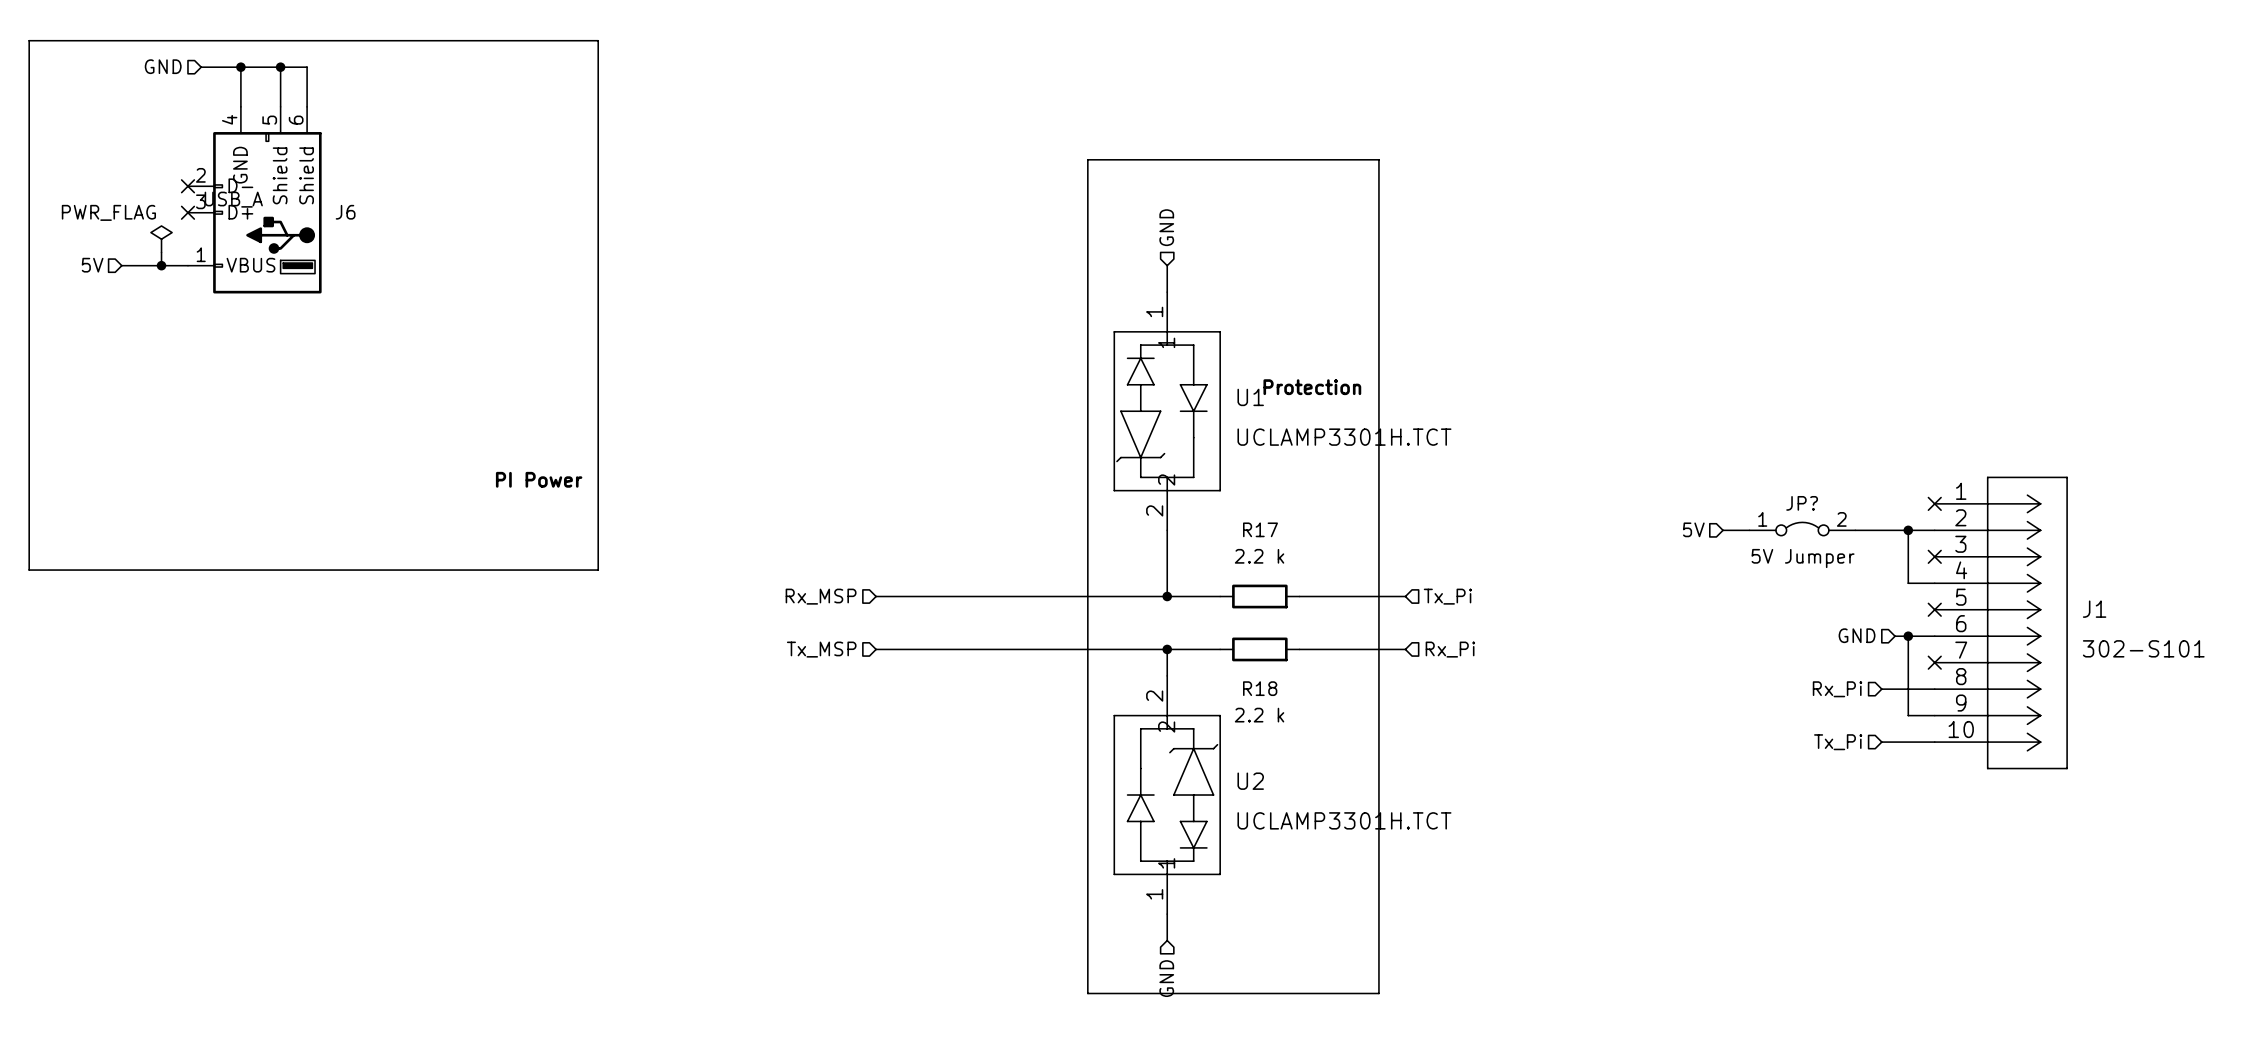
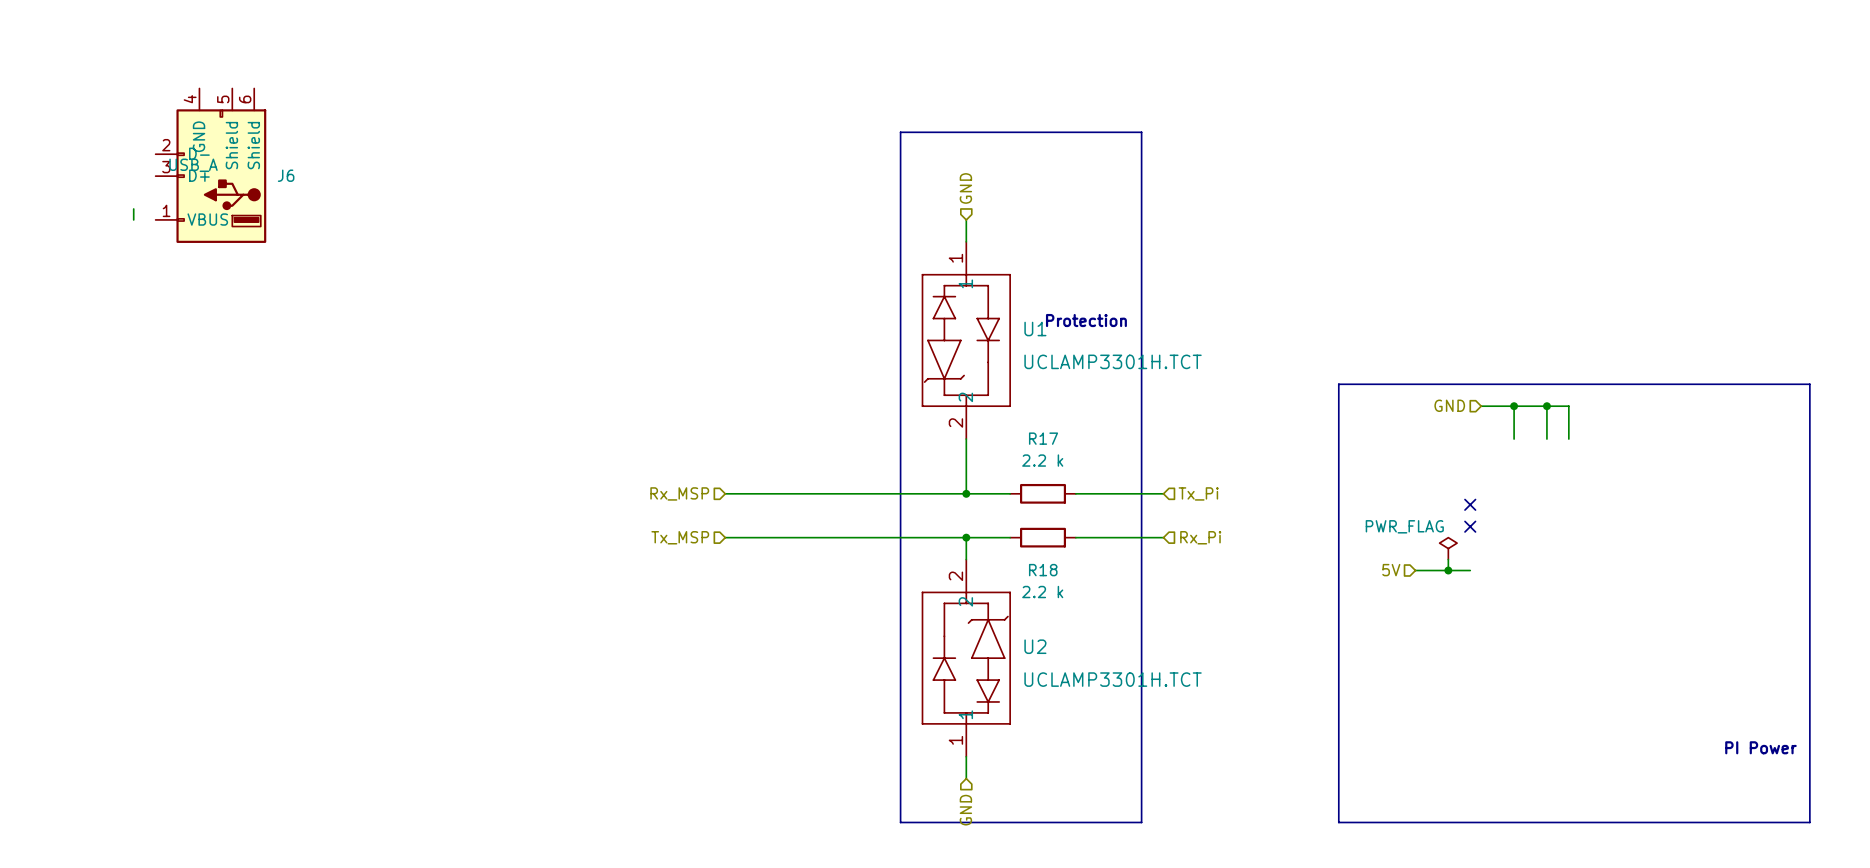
line: (29, 40) (29, 570) (598, 570) (598, 40) (29, 40) -> none
hierarchical label: GND (163, 66) -> none
wire: (201, 67) (307, 67) (307, 106) -> none
wire: (240, 67) (240, 106) -> none
junction: (240, 67) -> none
wire: (280, 67) (280, 106) -> none
junction: (280, 67) -> none
no-connect mark: (187, 186) -> none
no-connect mark: (187, 212) -> none
power symbol: PWR_FLAG (161, 239) -> none
hierarchical label: 5V (92, 265) -> none
wire: (121, 265) (187, 265) -> none
junction: (161, 265) -> none
line: none -> (1338, 384) (1338, 822) (1809, 822) (1809, 384) (1338, 384)
text: PI Power (539, 479) -> none
wire: none -> (1481, 406) (1568, 406) (1568, 439)
wire: none -> (1514, 406) (1514, 439)
junction: none -> (1514, 406)
wire: none -> (1546, 406) (1546, 439)
junction: none -> (1546, 406)
no-connect mark: (1934, 503) -> none
hierarchical label position: 5V (1693, 529) -> 5V (1391, 570)
JP?: 5V Jumper (1802, 529) -> none
wire: (1723, 530) (1749, 530) -> none
wire: (1855, 530) (1934, 530) -> none
wire: (1908, 530) (1908, 583) (1934, 583) -> none
junction: (1908, 530) -> none
no-connect mark: (1934, 556) -> none
no-connect mark: none -> (1470, 504)
no-connect mark: (1934, 609) -> none
J1: 302-S101 (2001, 622) -> none
hierarchical label position: GND (1857, 635) -> GND (1449, 405)
no-connect mark: none -> (1470, 526)
wire: (1895, 636) (1934, 636) -> none
wire: (1908, 636) (1908, 715) (1934, 715) -> none
junction: (1908, 636) -> none
power symbol: none -> PWR_FLAG (1448, 548)
no-connect mark: (1934, 662) -> none
wire: none -> (1448, 559) (1448, 570)
wire: none -> (1415, 570) (1470, 570)
junction: none -> (1448, 570)
hierarchical label: Rx_Pi (1837, 689) -> none
wire: (1881, 689) (1934, 689) -> none
hierarchical label: Tx_Pi (1838, 742) -> none
wire: (1881, 742) (1934, 742) -> none
text: none -> PI Power (1760, 747)

